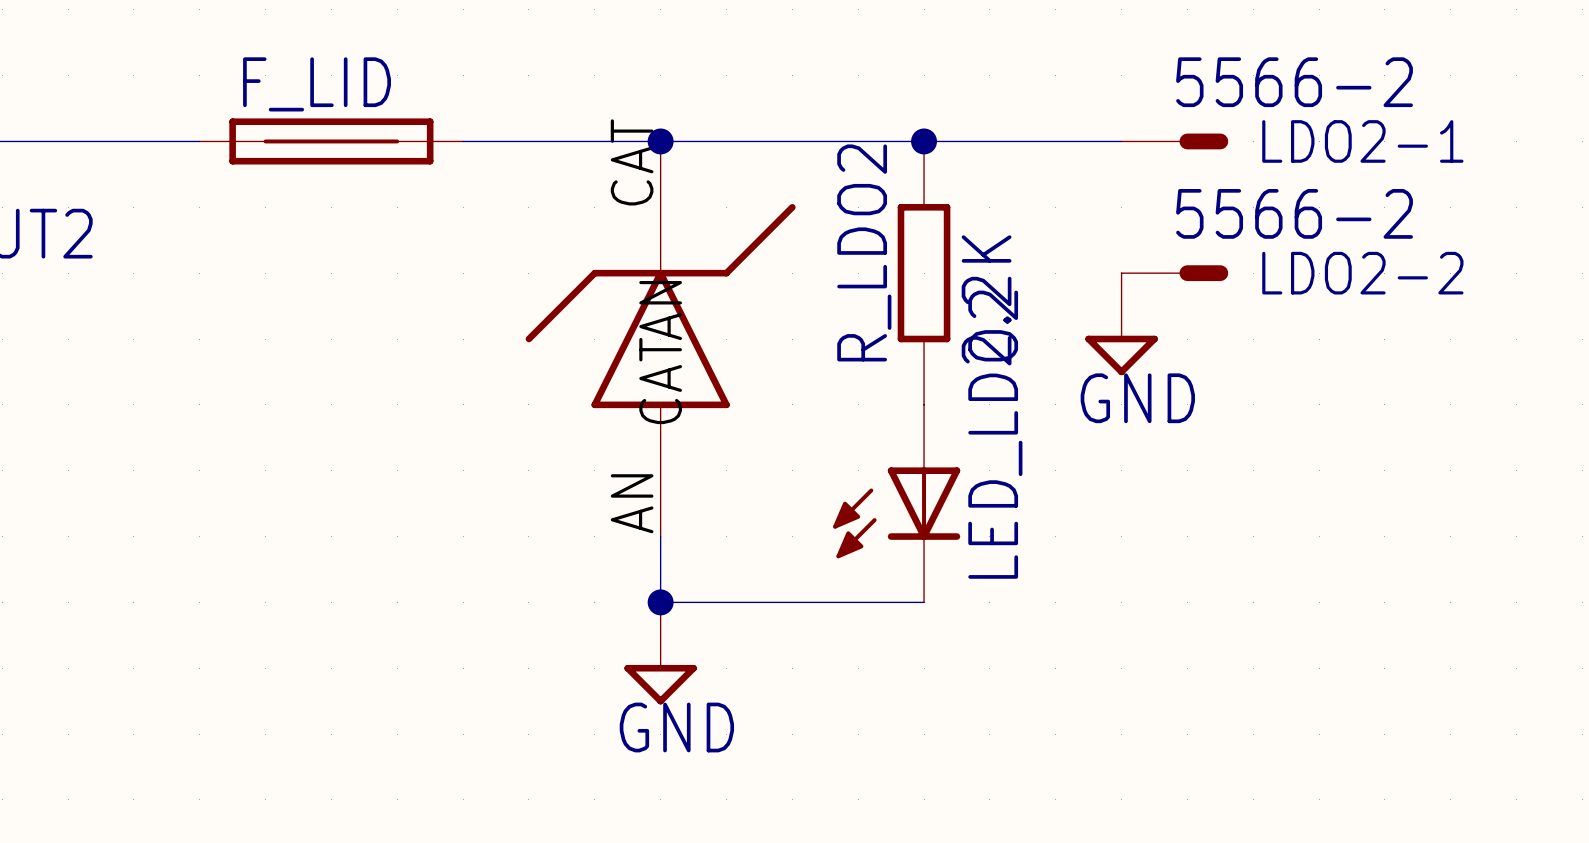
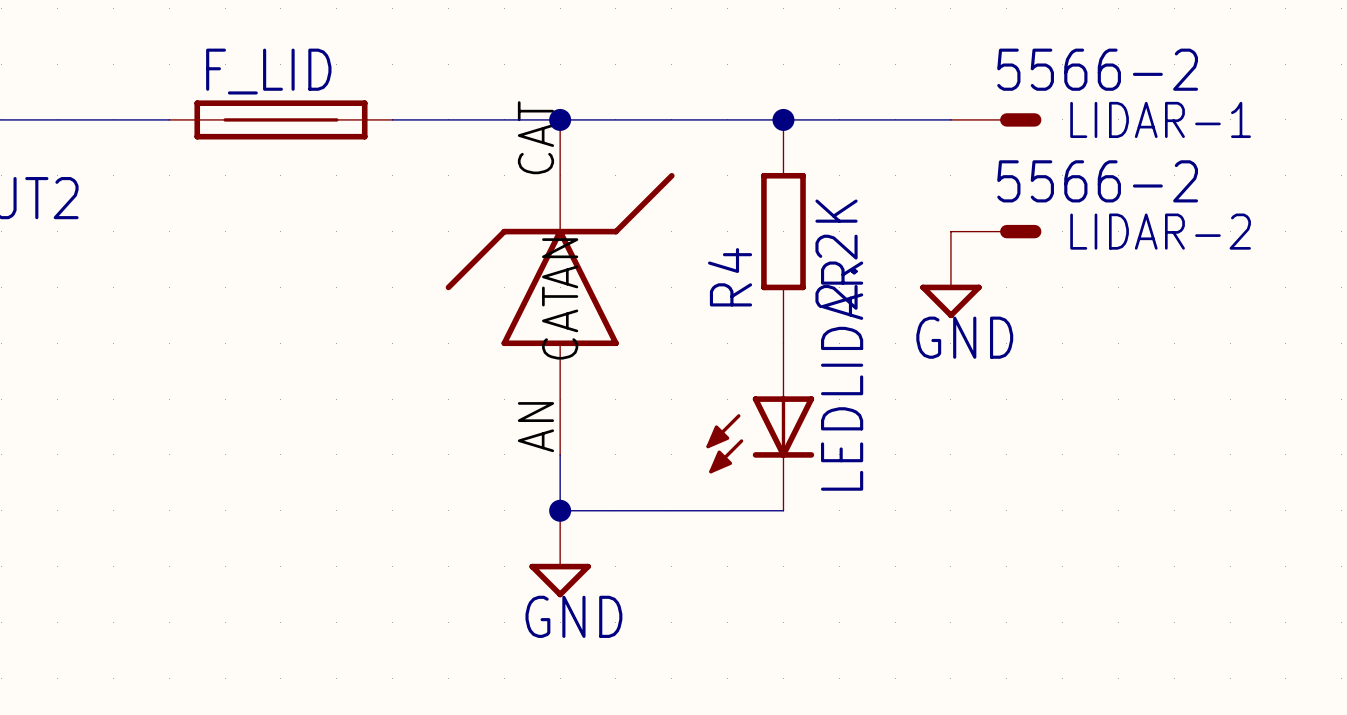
LDO2-1 name: LDO2-1 (1362, 141) -> LIDAR-1 (1160, 119)
R_LDO2 name: R_LDO2 (864, 252) -> R4 (730, 277)
LDO2-2 name: LDO2-2 (1362, 273) -> LIDAR-2 (1160, 231)
LED_LDO2 name: LED_LDO2 (995, 434) -> LEDLIDAR (842, 376)

